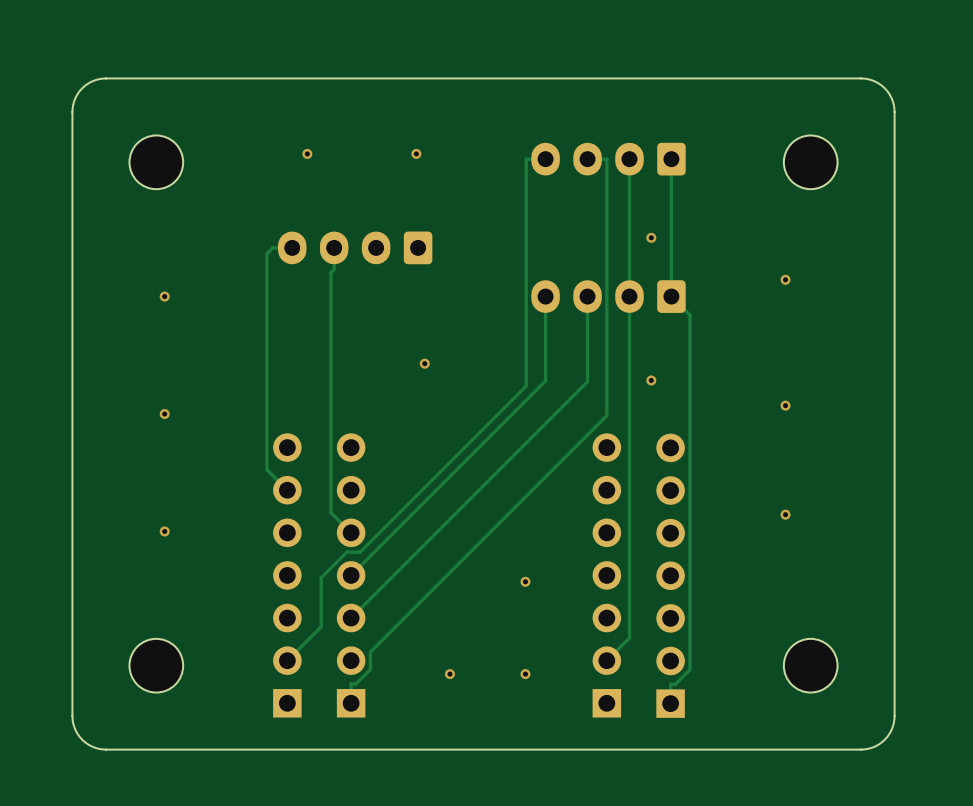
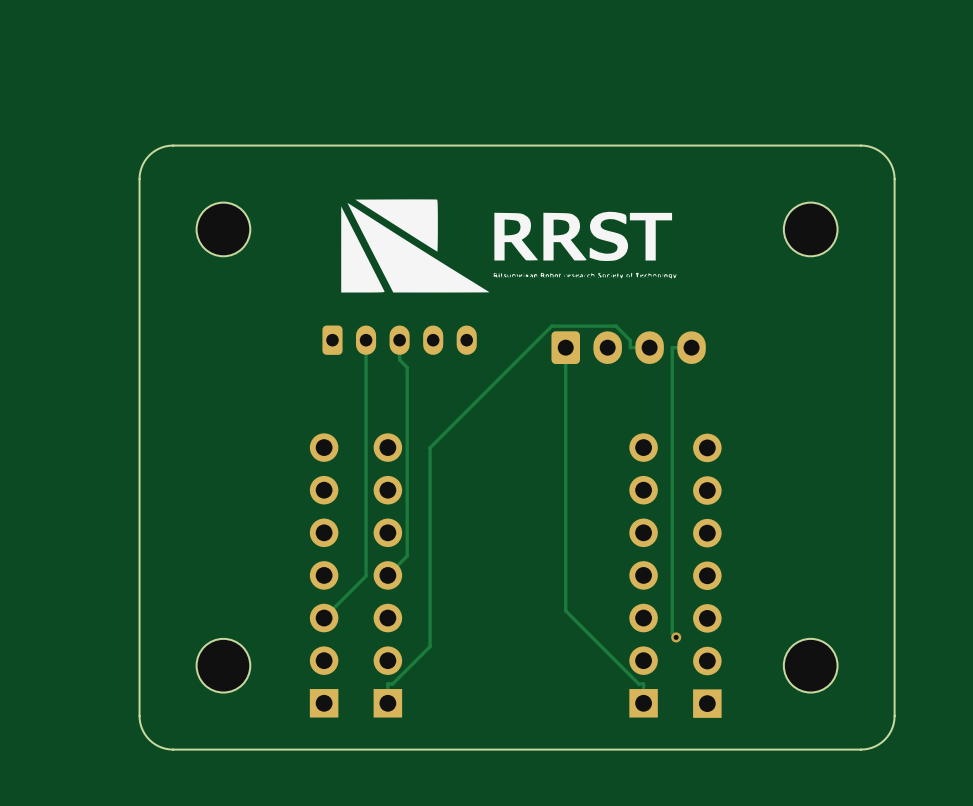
via: (307, 153) -> none
via: (416, 153) -> none
track: (545, 159) (526, 159) (526, 385) (360, 552) (346, 552) (321, 577) (321, 626) (287, 660) -> none
track: (587, 159) (606, 159) (606, 415) (370, 652) (370, 669) (355, 683) (351, 683) (351, 703) -> none
part: (608, 159) -> none
track: (629, 159) (629, 638) (606, 660) -> none
track: (671, 159) (671, 296) (690, 315) (690, 669) (675, 684) (670, 684) (670, 703) -> none
part position: (156, 162) -> (223, 229)
part position: (810, 162) -> (810, 229)
board edge: (894, 179) (894, 112) (892, 100) (881, 85) (864, 78) (105, 78) (94, 80) (85, 85) (75, 97) (72, 112) (72, 719) (79, 736) (94, 747) (105, 749) (173, 749) -> (894, 179) (892, 168) (884, 155) (872, 147) (861, 145) (173, 145) (162, 147) (152, 152) (142, 164) (139, 179) (139, 716) (141, 727) (149, 739) (162, 747) (173, 749)
drawing: none -> [341, 199, 677, 293]
via: (651, 237) -> none
track: (292, 247) (272, 247) (266, 253) (266, 469) (287, 490) -> none
track: (334, 247) (334, 269) (330, 272) (330, 512) (351, 532) -> none
part: (355, 247) -> none
via: (785, 279) -> none
via: (164, 296) -> none
track: (545, 296) (545, 380) (351, 575) -> none
track: (587, 296) (587, 381) (351, 618) -> none
part rotation: 0° (608, 296) -> 180° (628, 347)
track: none -> (366, 340) (366, 576) (324, 618)
track: none -> (399, 340) (399, 359) (407, 367) (407, 556) (387, 575)
part: none -> (399, 340)
track: none -> (565, 347) (565, 610) (638, 683) (643, 683) (643, 703)
track: none -> (649, 347) (630, 347) (630, 340) (616, 326) (551, 326) (430, 447) (430, 646) (392, 683) (387, 683) (387, 703)
track: none -> (691, 347) (672, 347) (672, 633) (676, 637)
via: (424, 363) -> none
via: (651, 380) -> none
via: (785, 405) -> none
via: (164, 414) -> none
via: (785, 514) -> none
via: (164, 531) -> none
part: (287, 575) -> none
part: none -> (324, 575)
part: (351, 575) -> none
part: none -> (387, 575)
part: (606, 575) -> none
part: none -> (643, 575)
part: (670, 575) -> none
part: none -> (707, 575)
via: (525, 581) -> none
via: none -> (676, 637)
part position: (156, 665) -> (223, 665)
via: (449, 674) -> none
via: (525, 674) -> none

